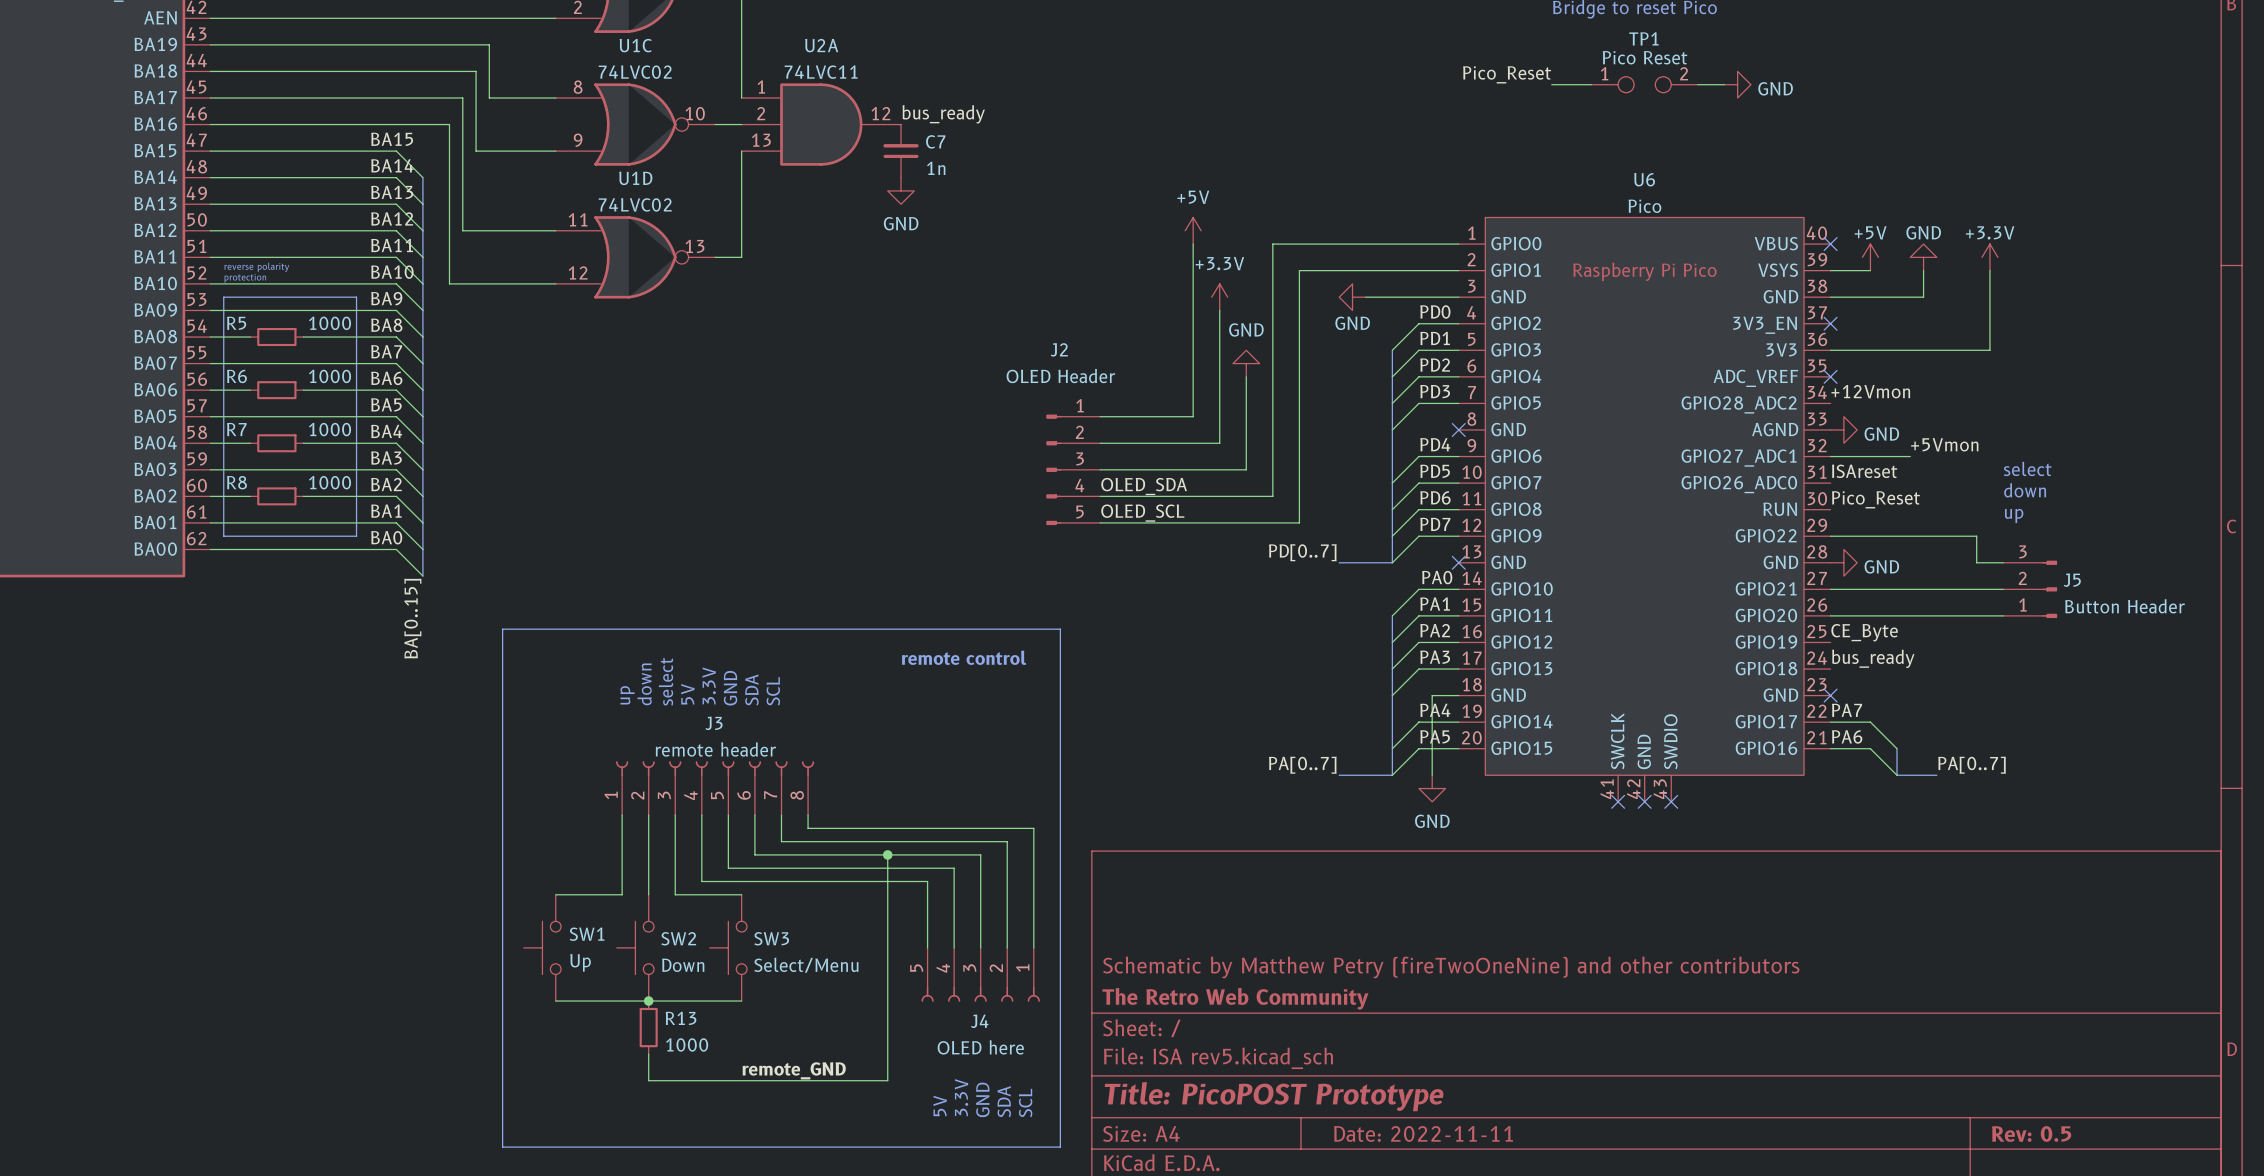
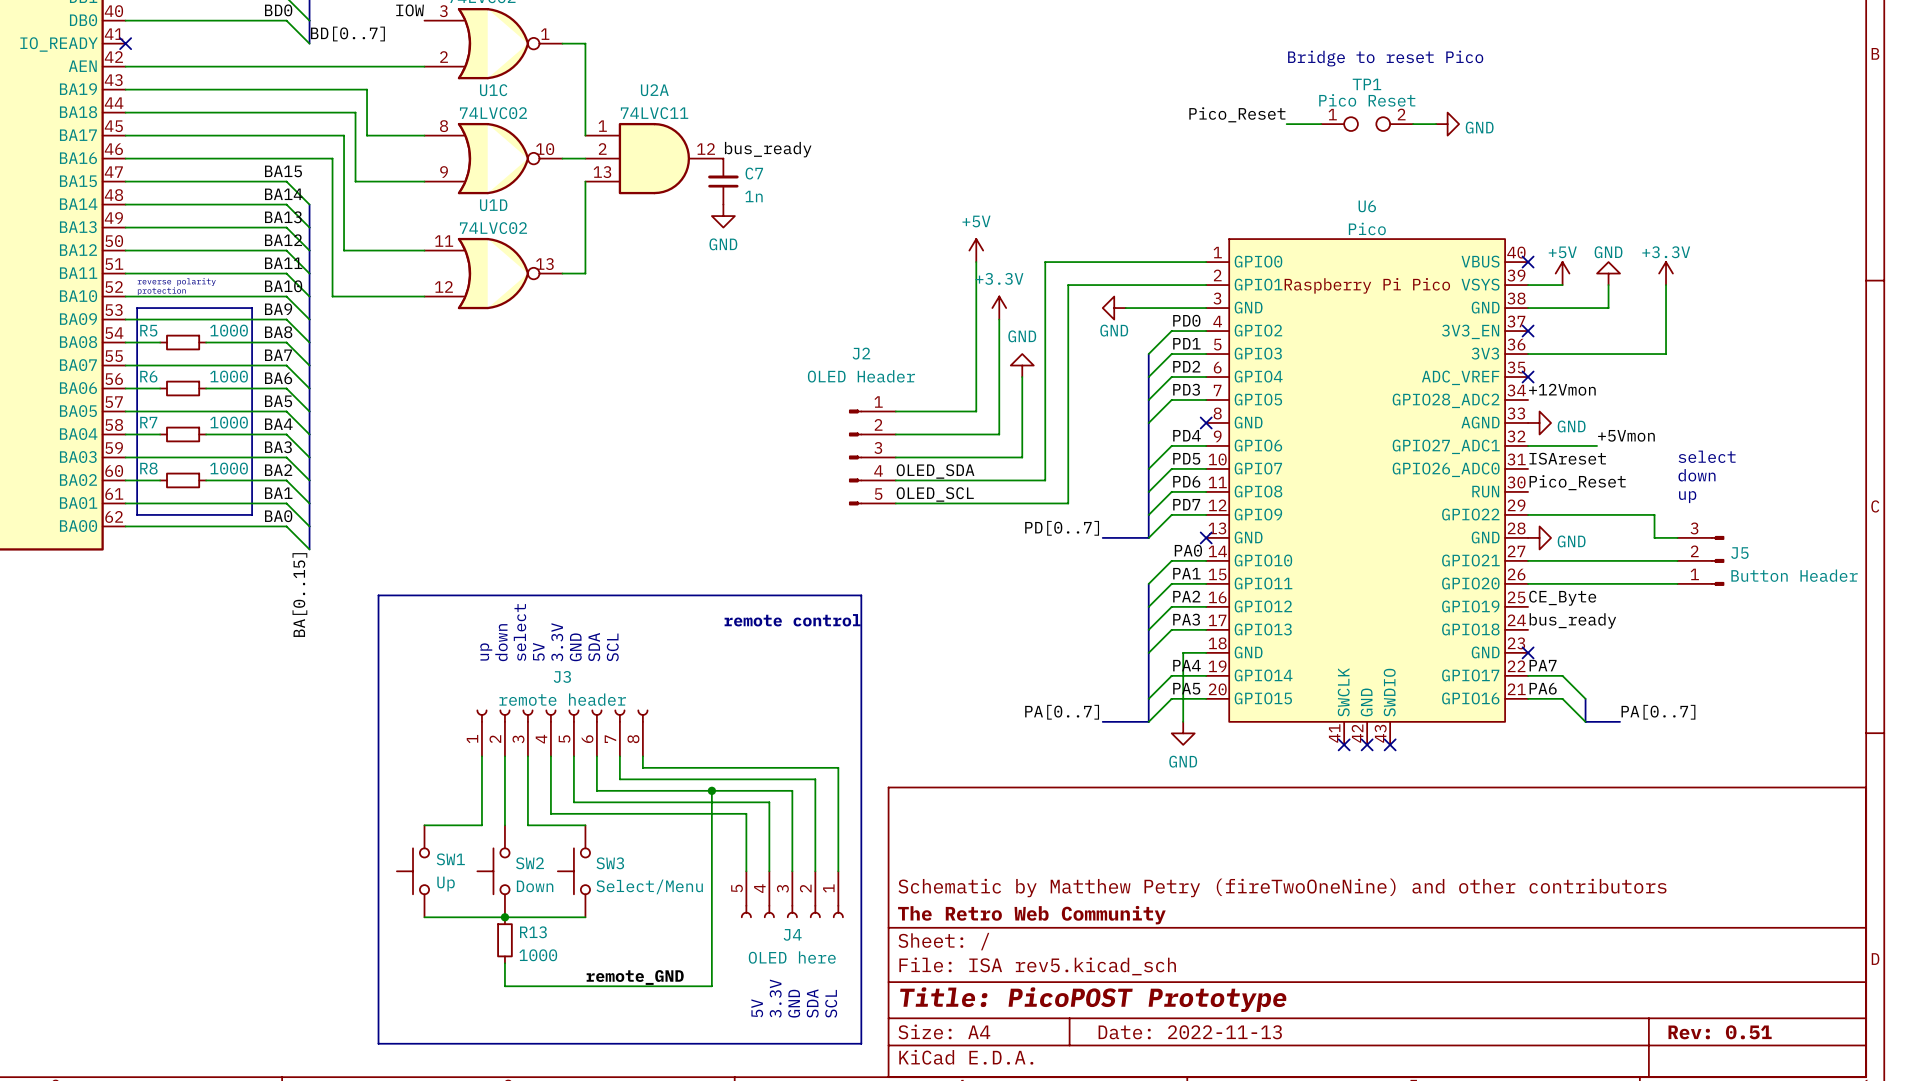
title block: Date: 2022-11-11 (1423, 1133) -> Date: 2022-11-13 (1190, 1032)
title block: Rev: 0.5 (2031, 1134) -> Rev: 0.51 (1720, 1032)

